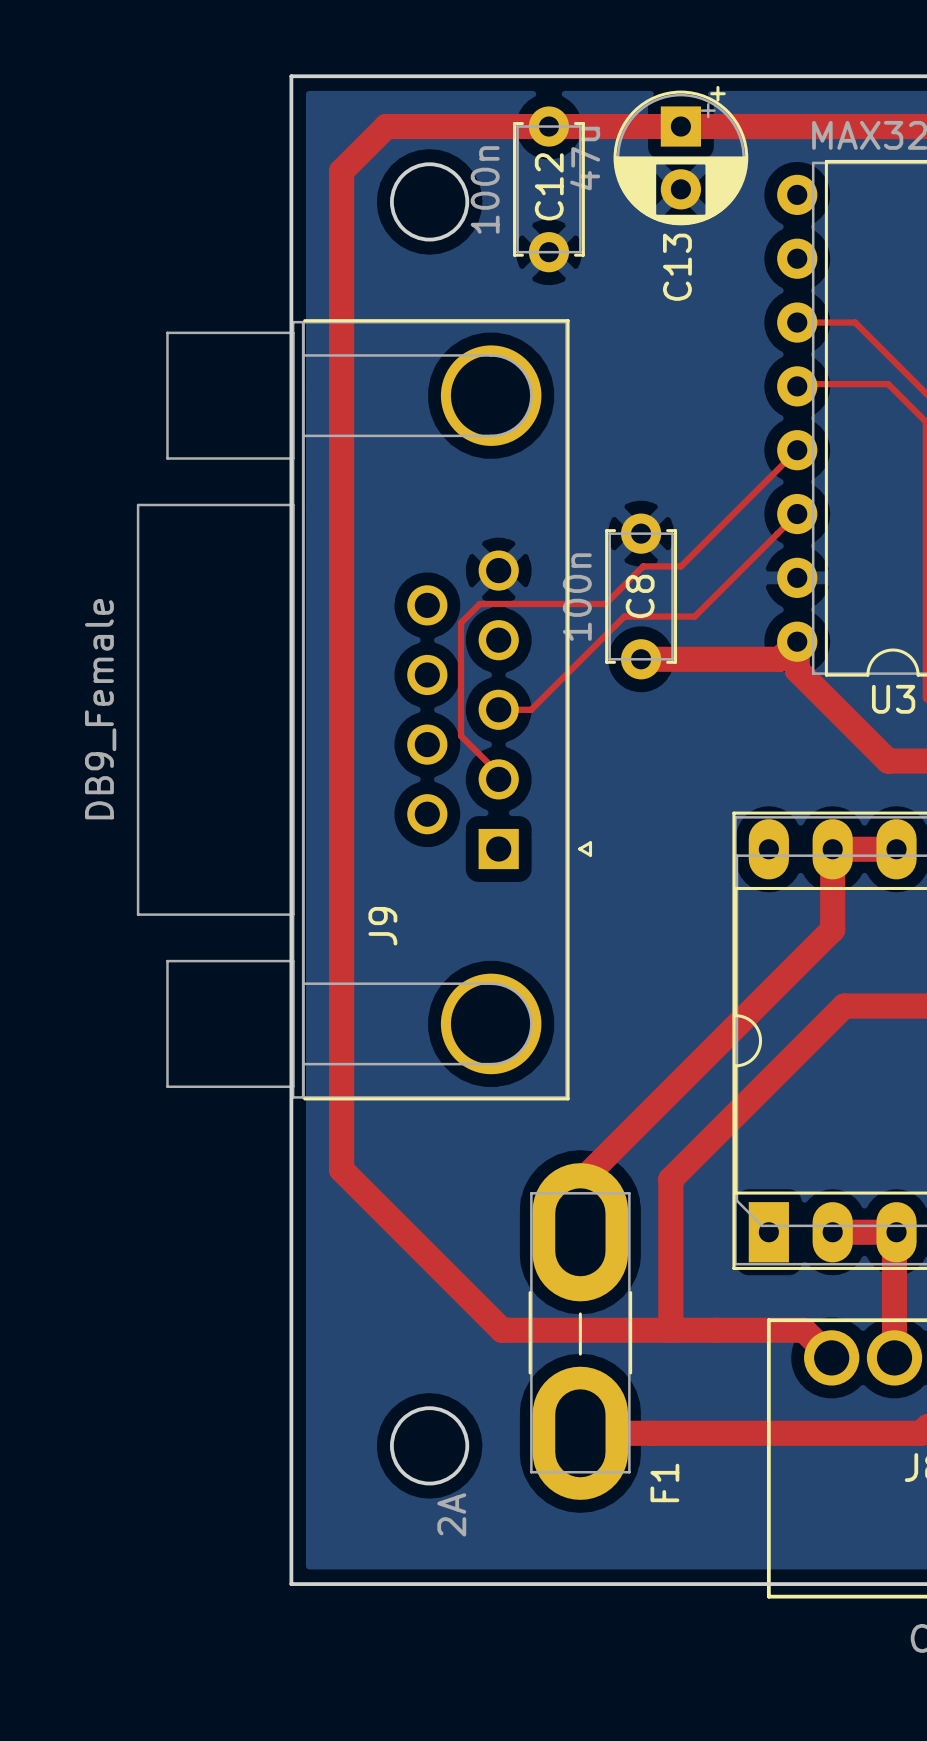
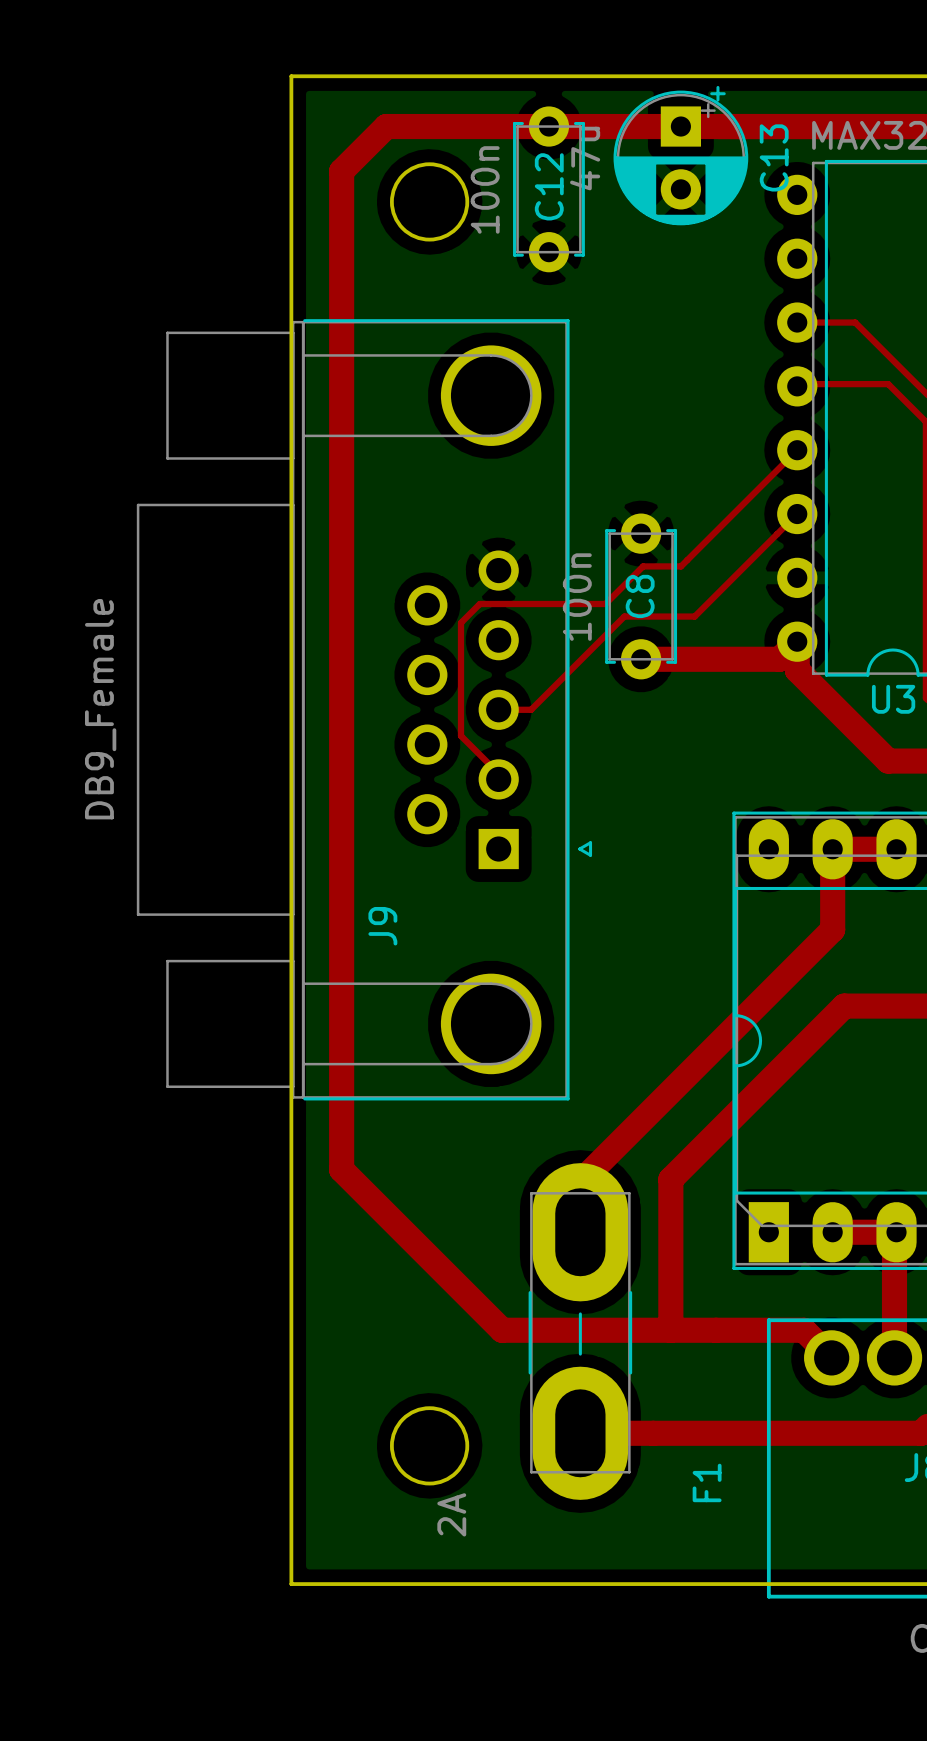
C13 name position: C13 (677, 267) -> C13 (774, 157)
F1 name position: F1 (664, 1482) -> F1 (707, 1482)

